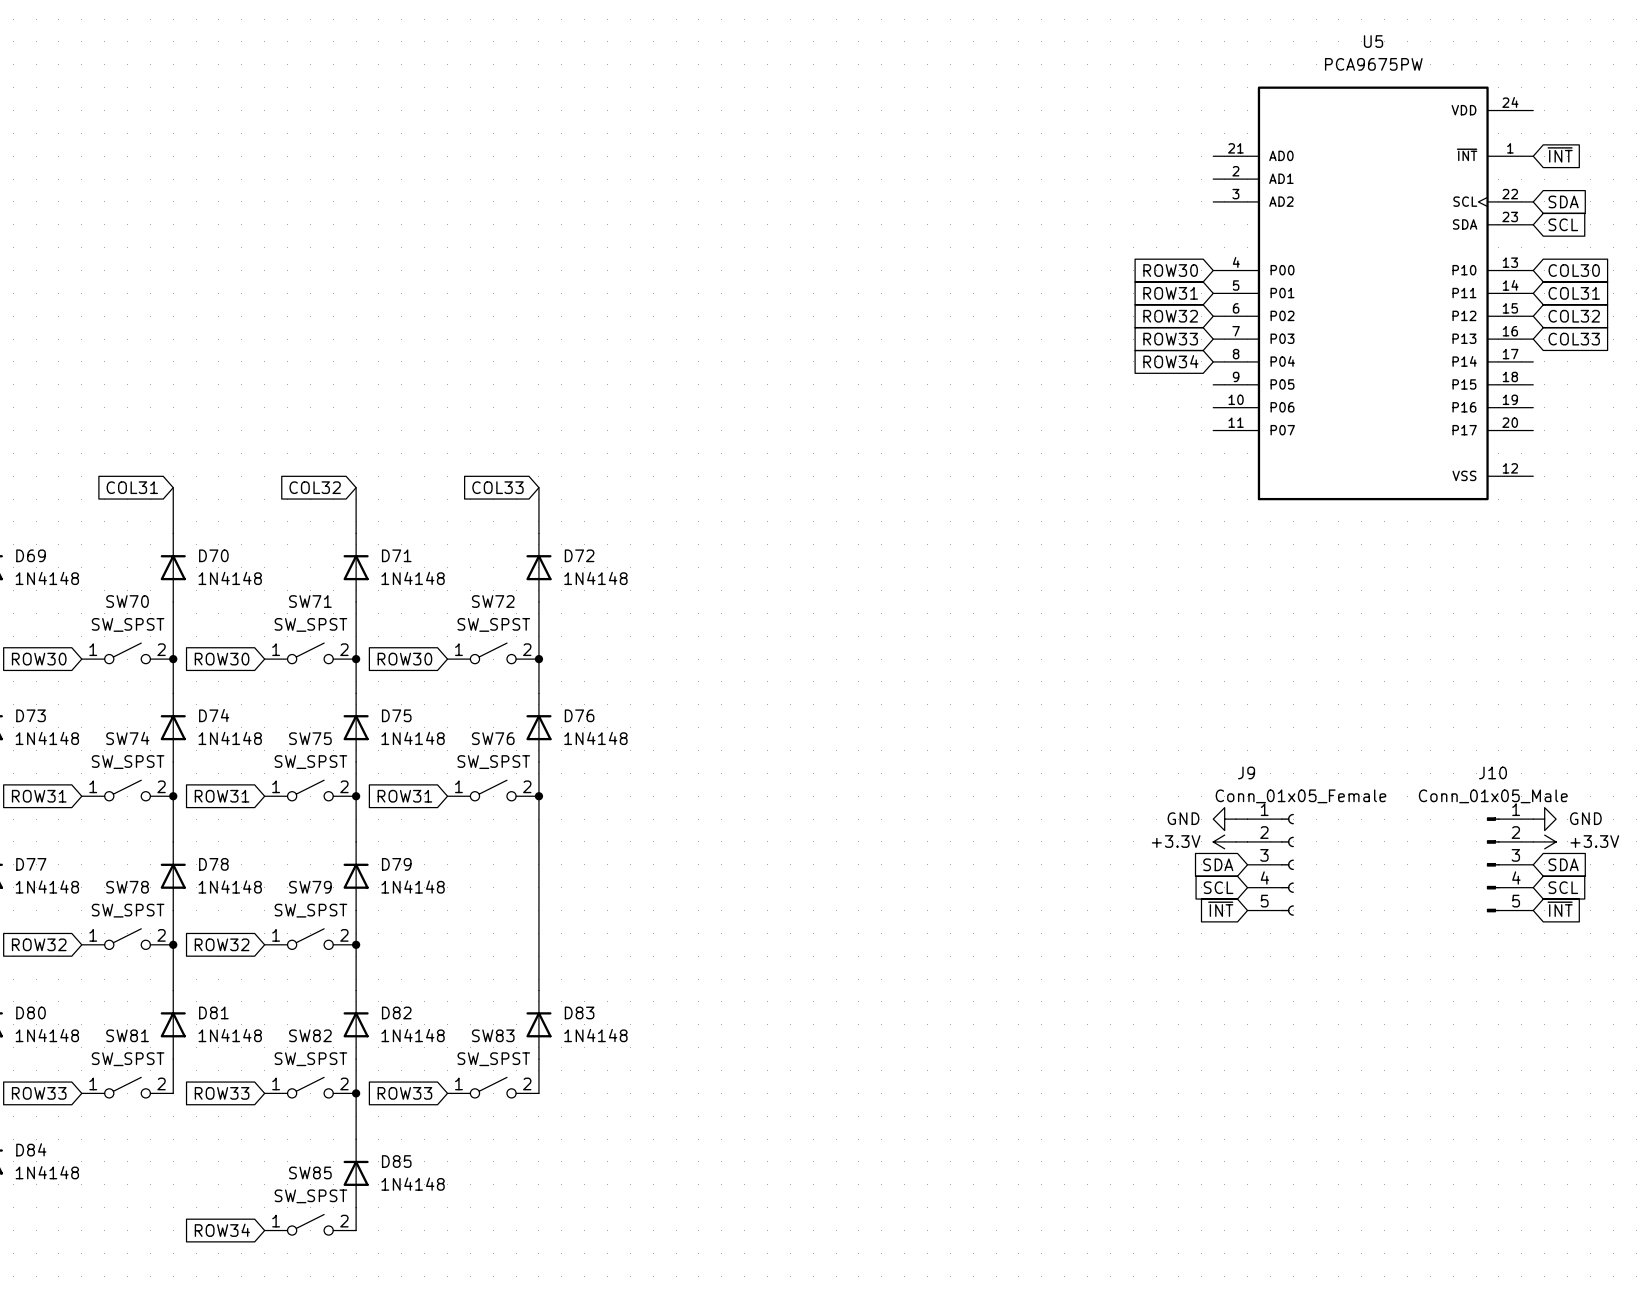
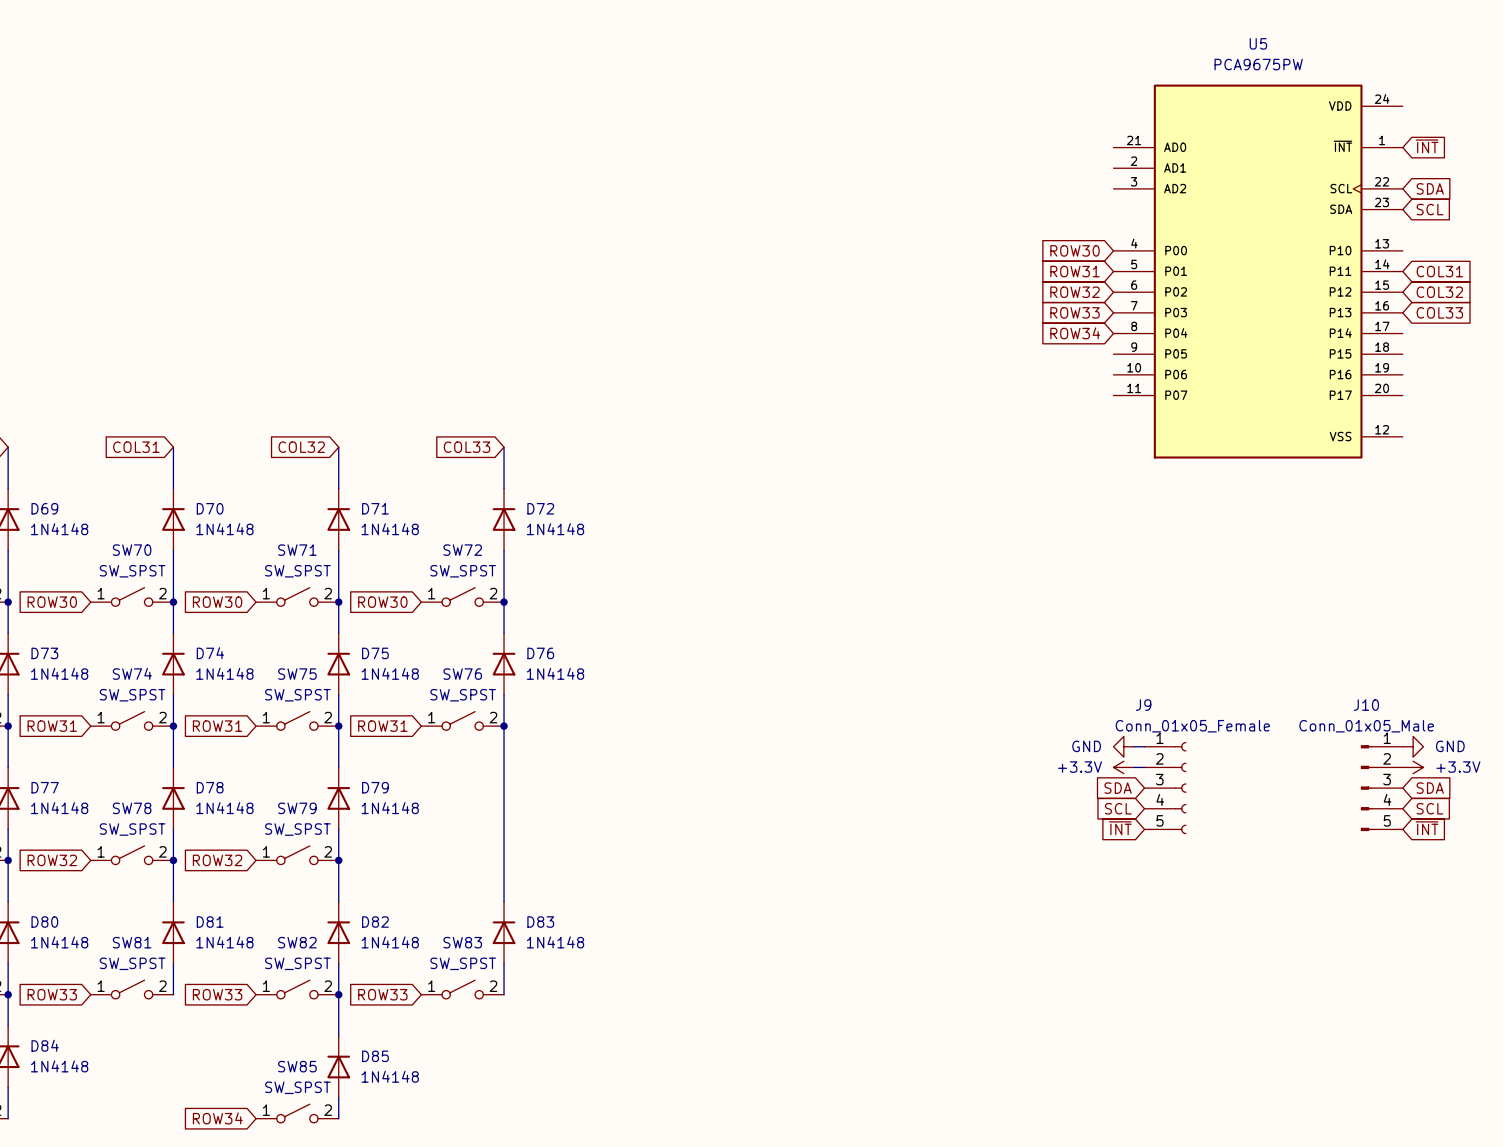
global label: COL30 (1574, 270) -> none

